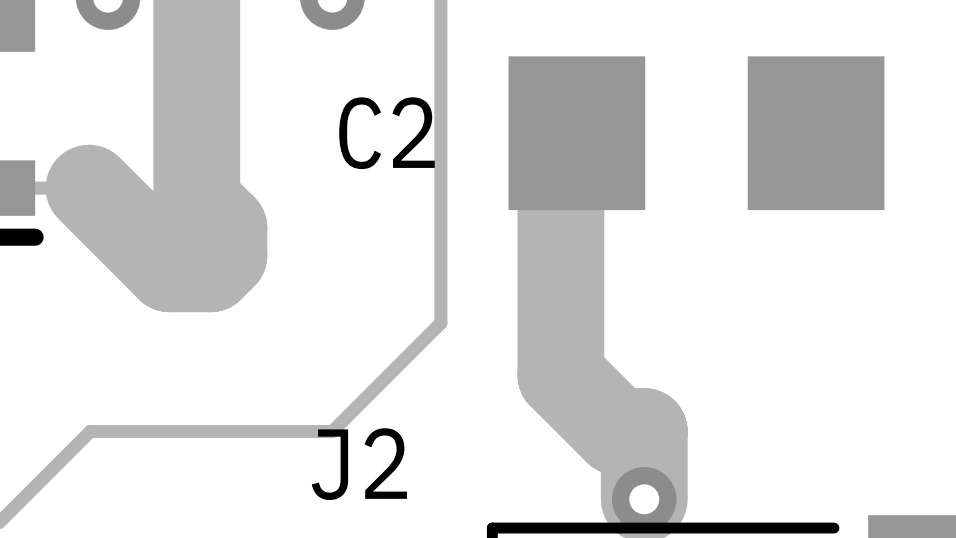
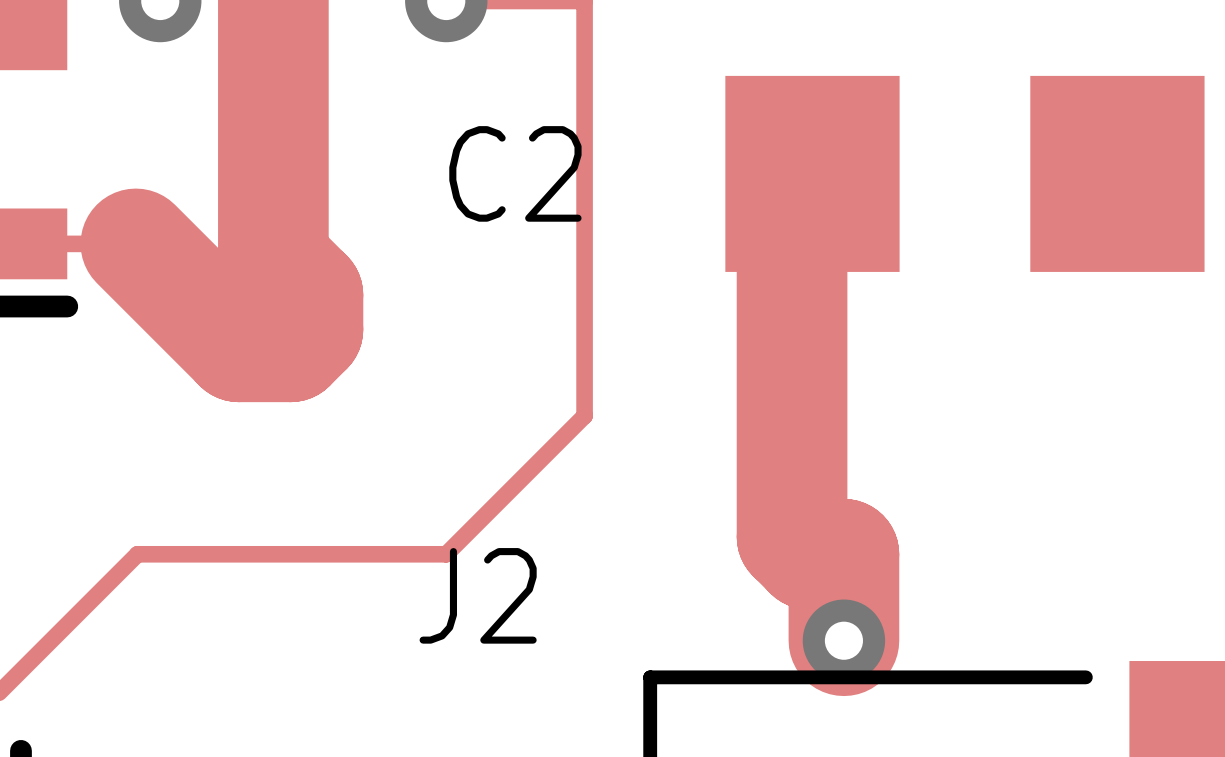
track: (576, 133) (560, 149) (560, 375) (603, 417) -> (812, 173) (792, 194) (792, 536)
C2 position: (696, 133) -> (964, 173)

